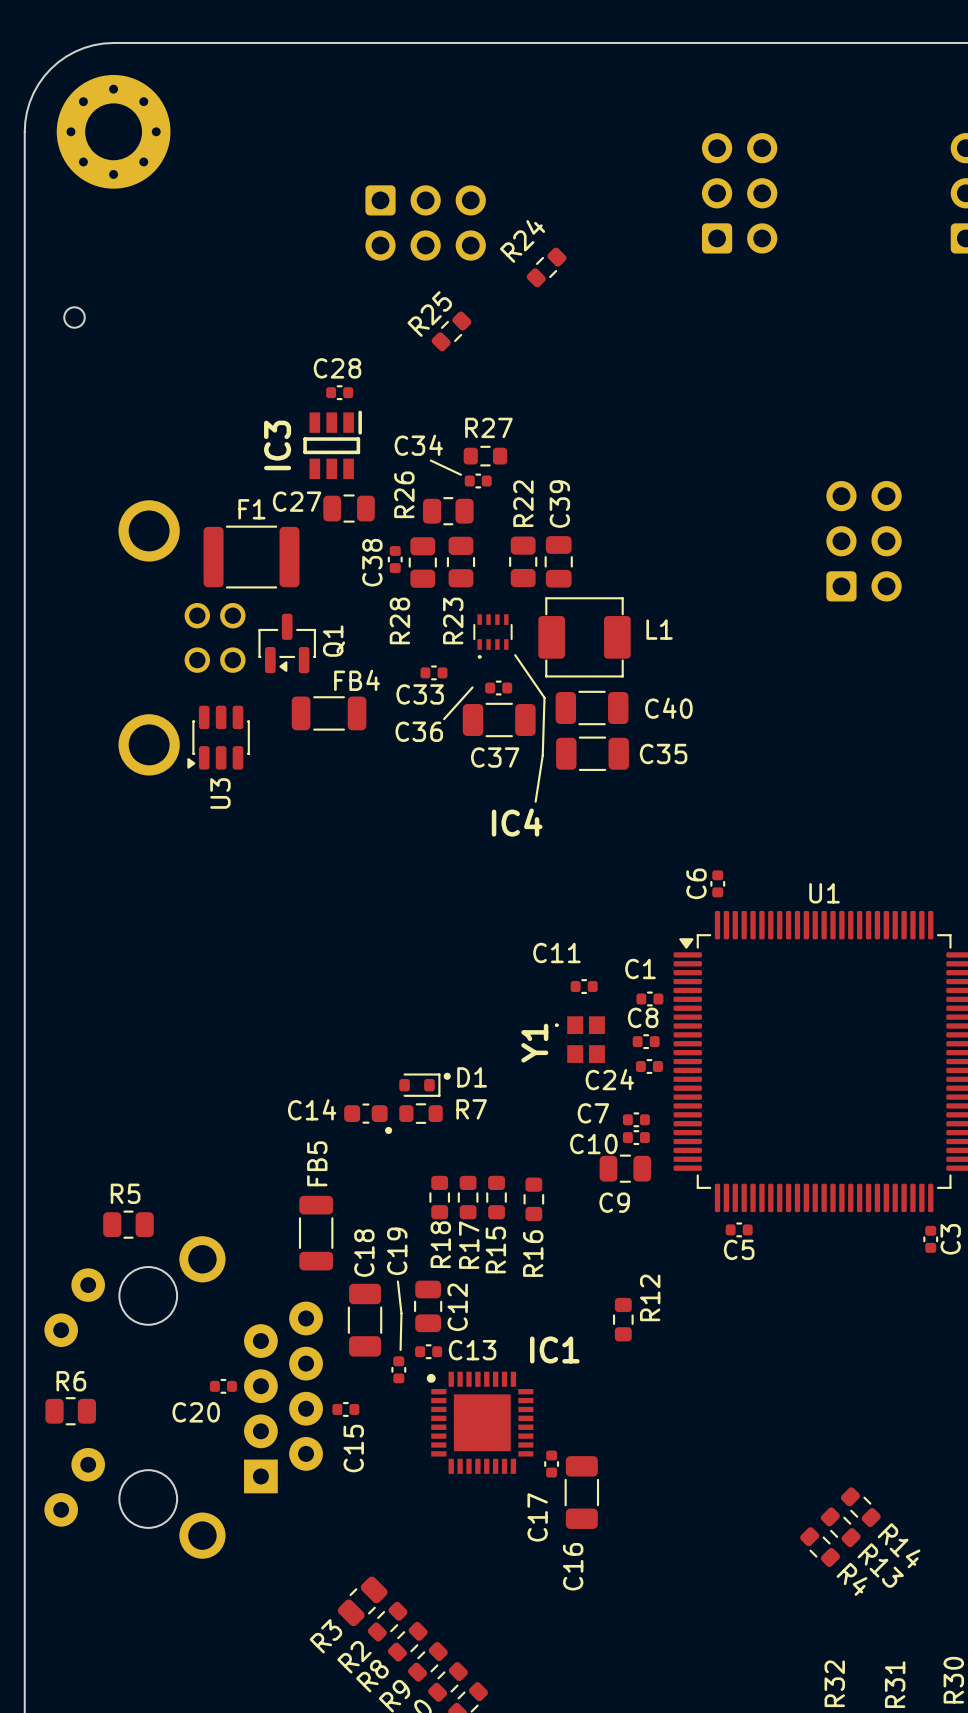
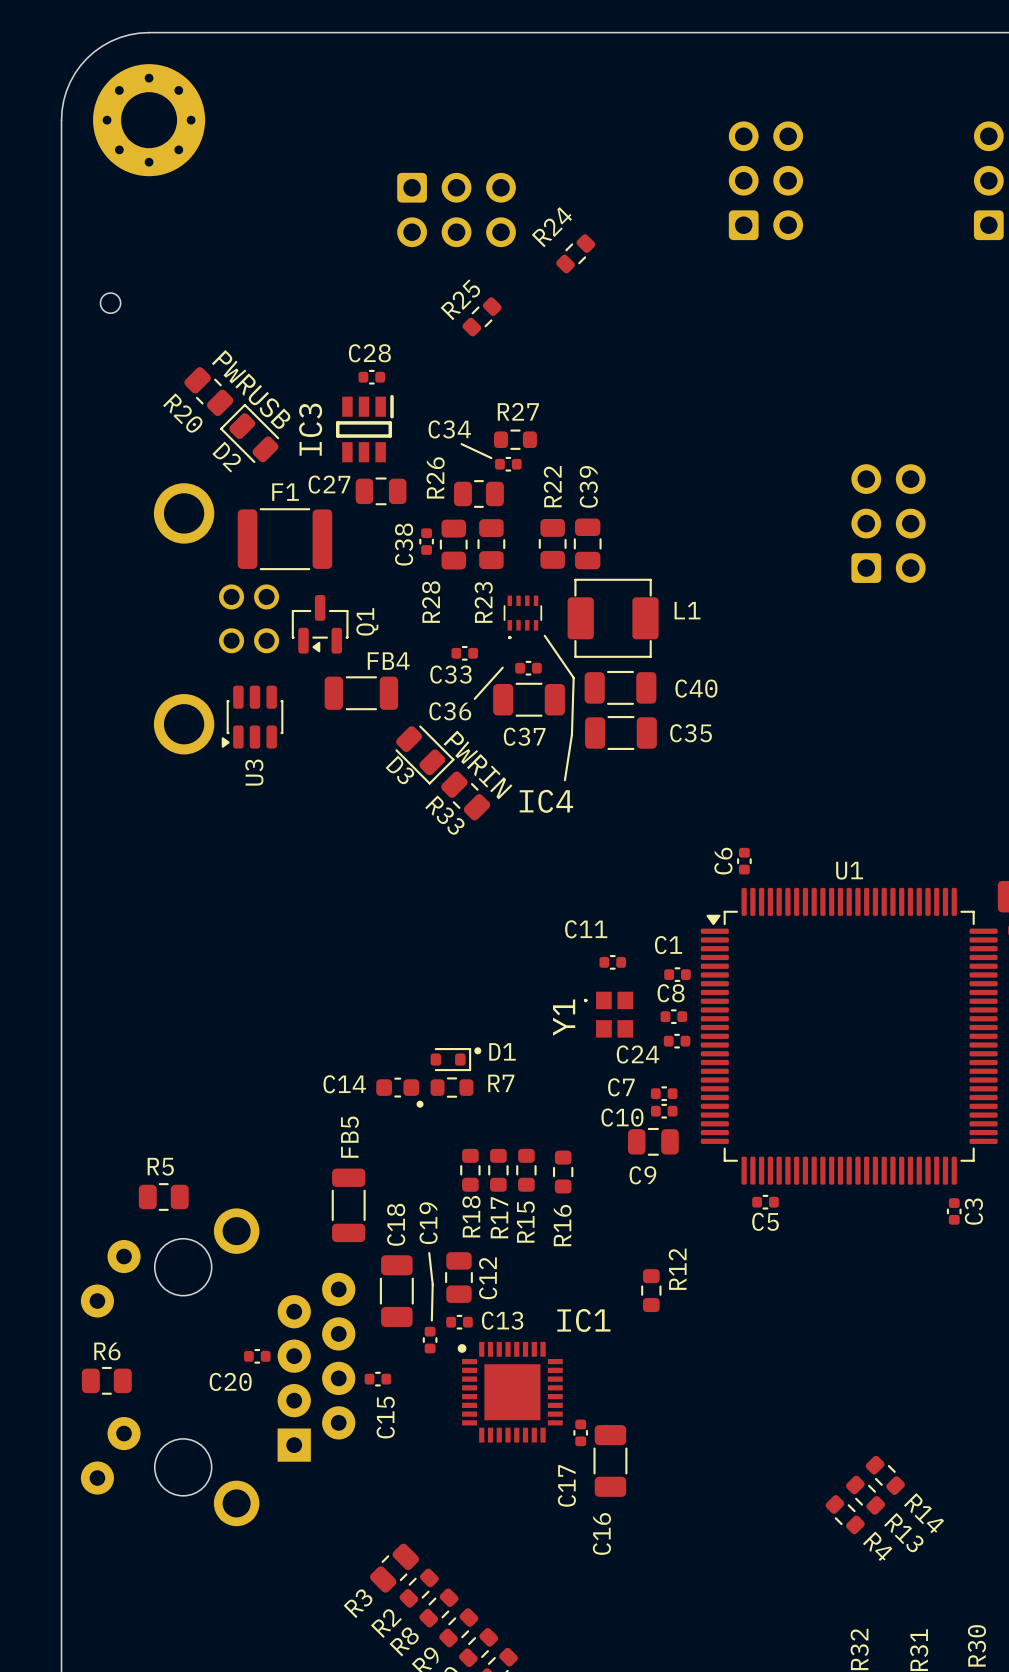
text: none -> PWRUSB (251, 389)
R20: none -> (208, 391)
D2: none -> (249, 433)
D3: none -> (424, 754)
text: none -> PWRIN (477, 764)
R33: none -> (465, 795)

